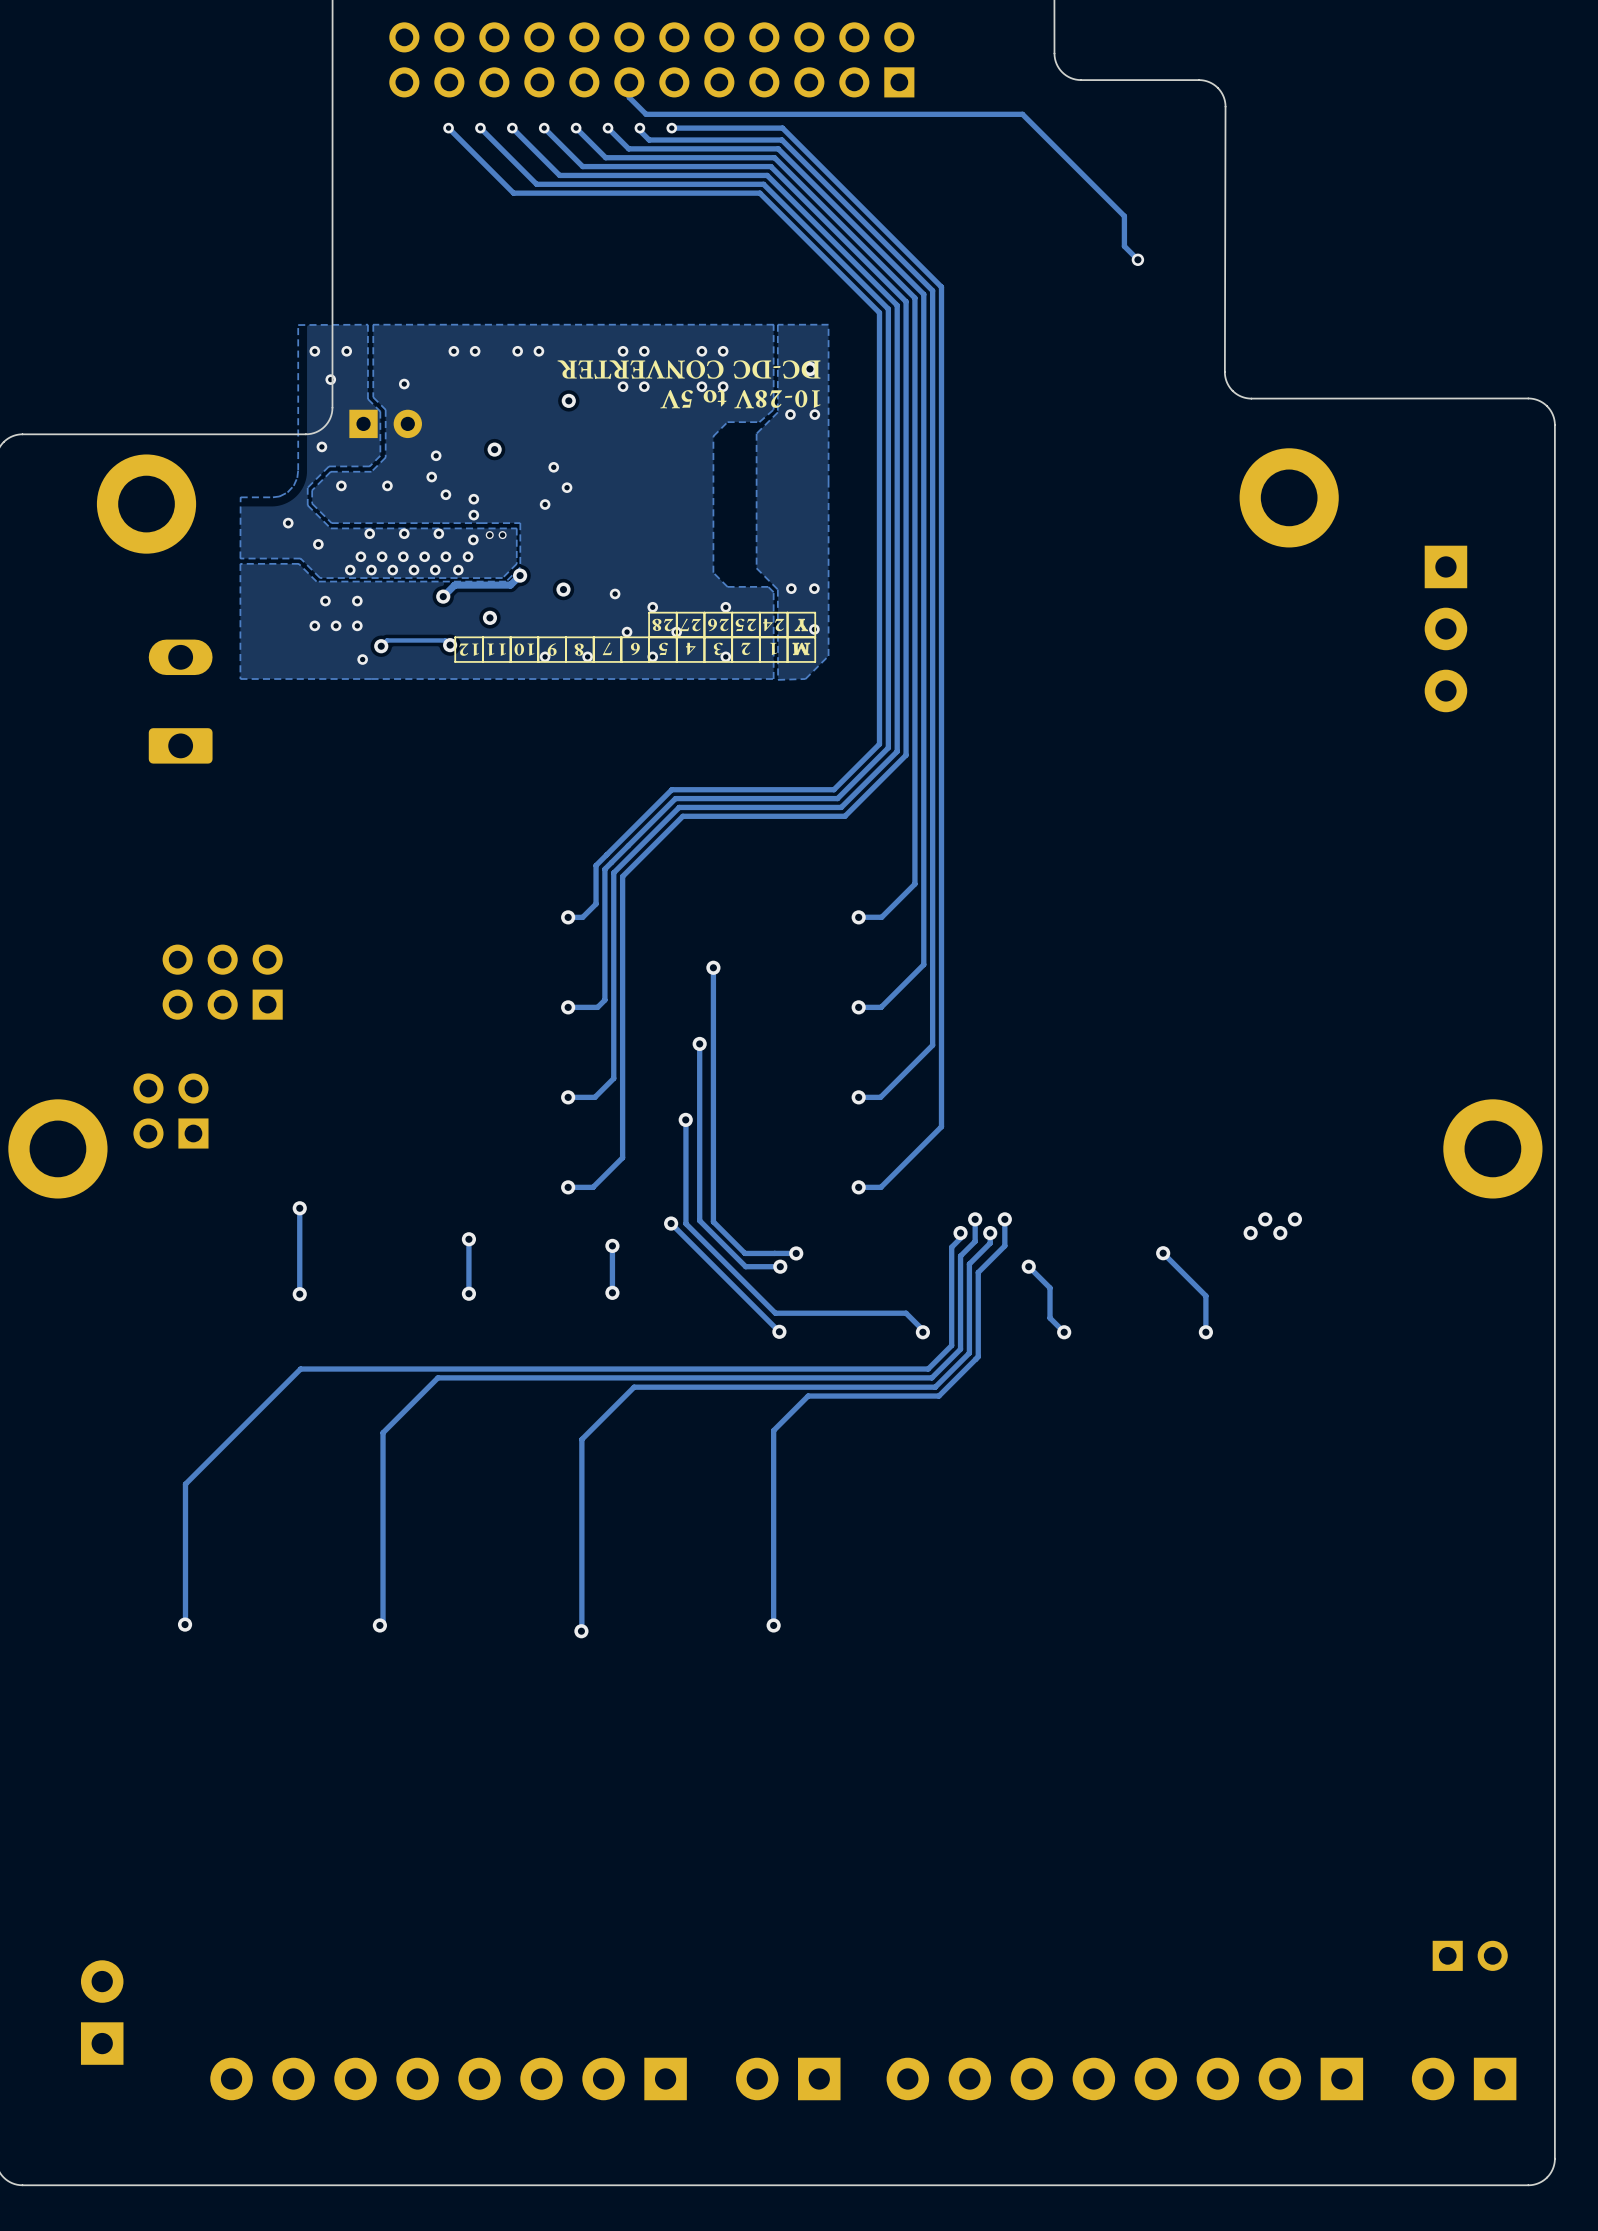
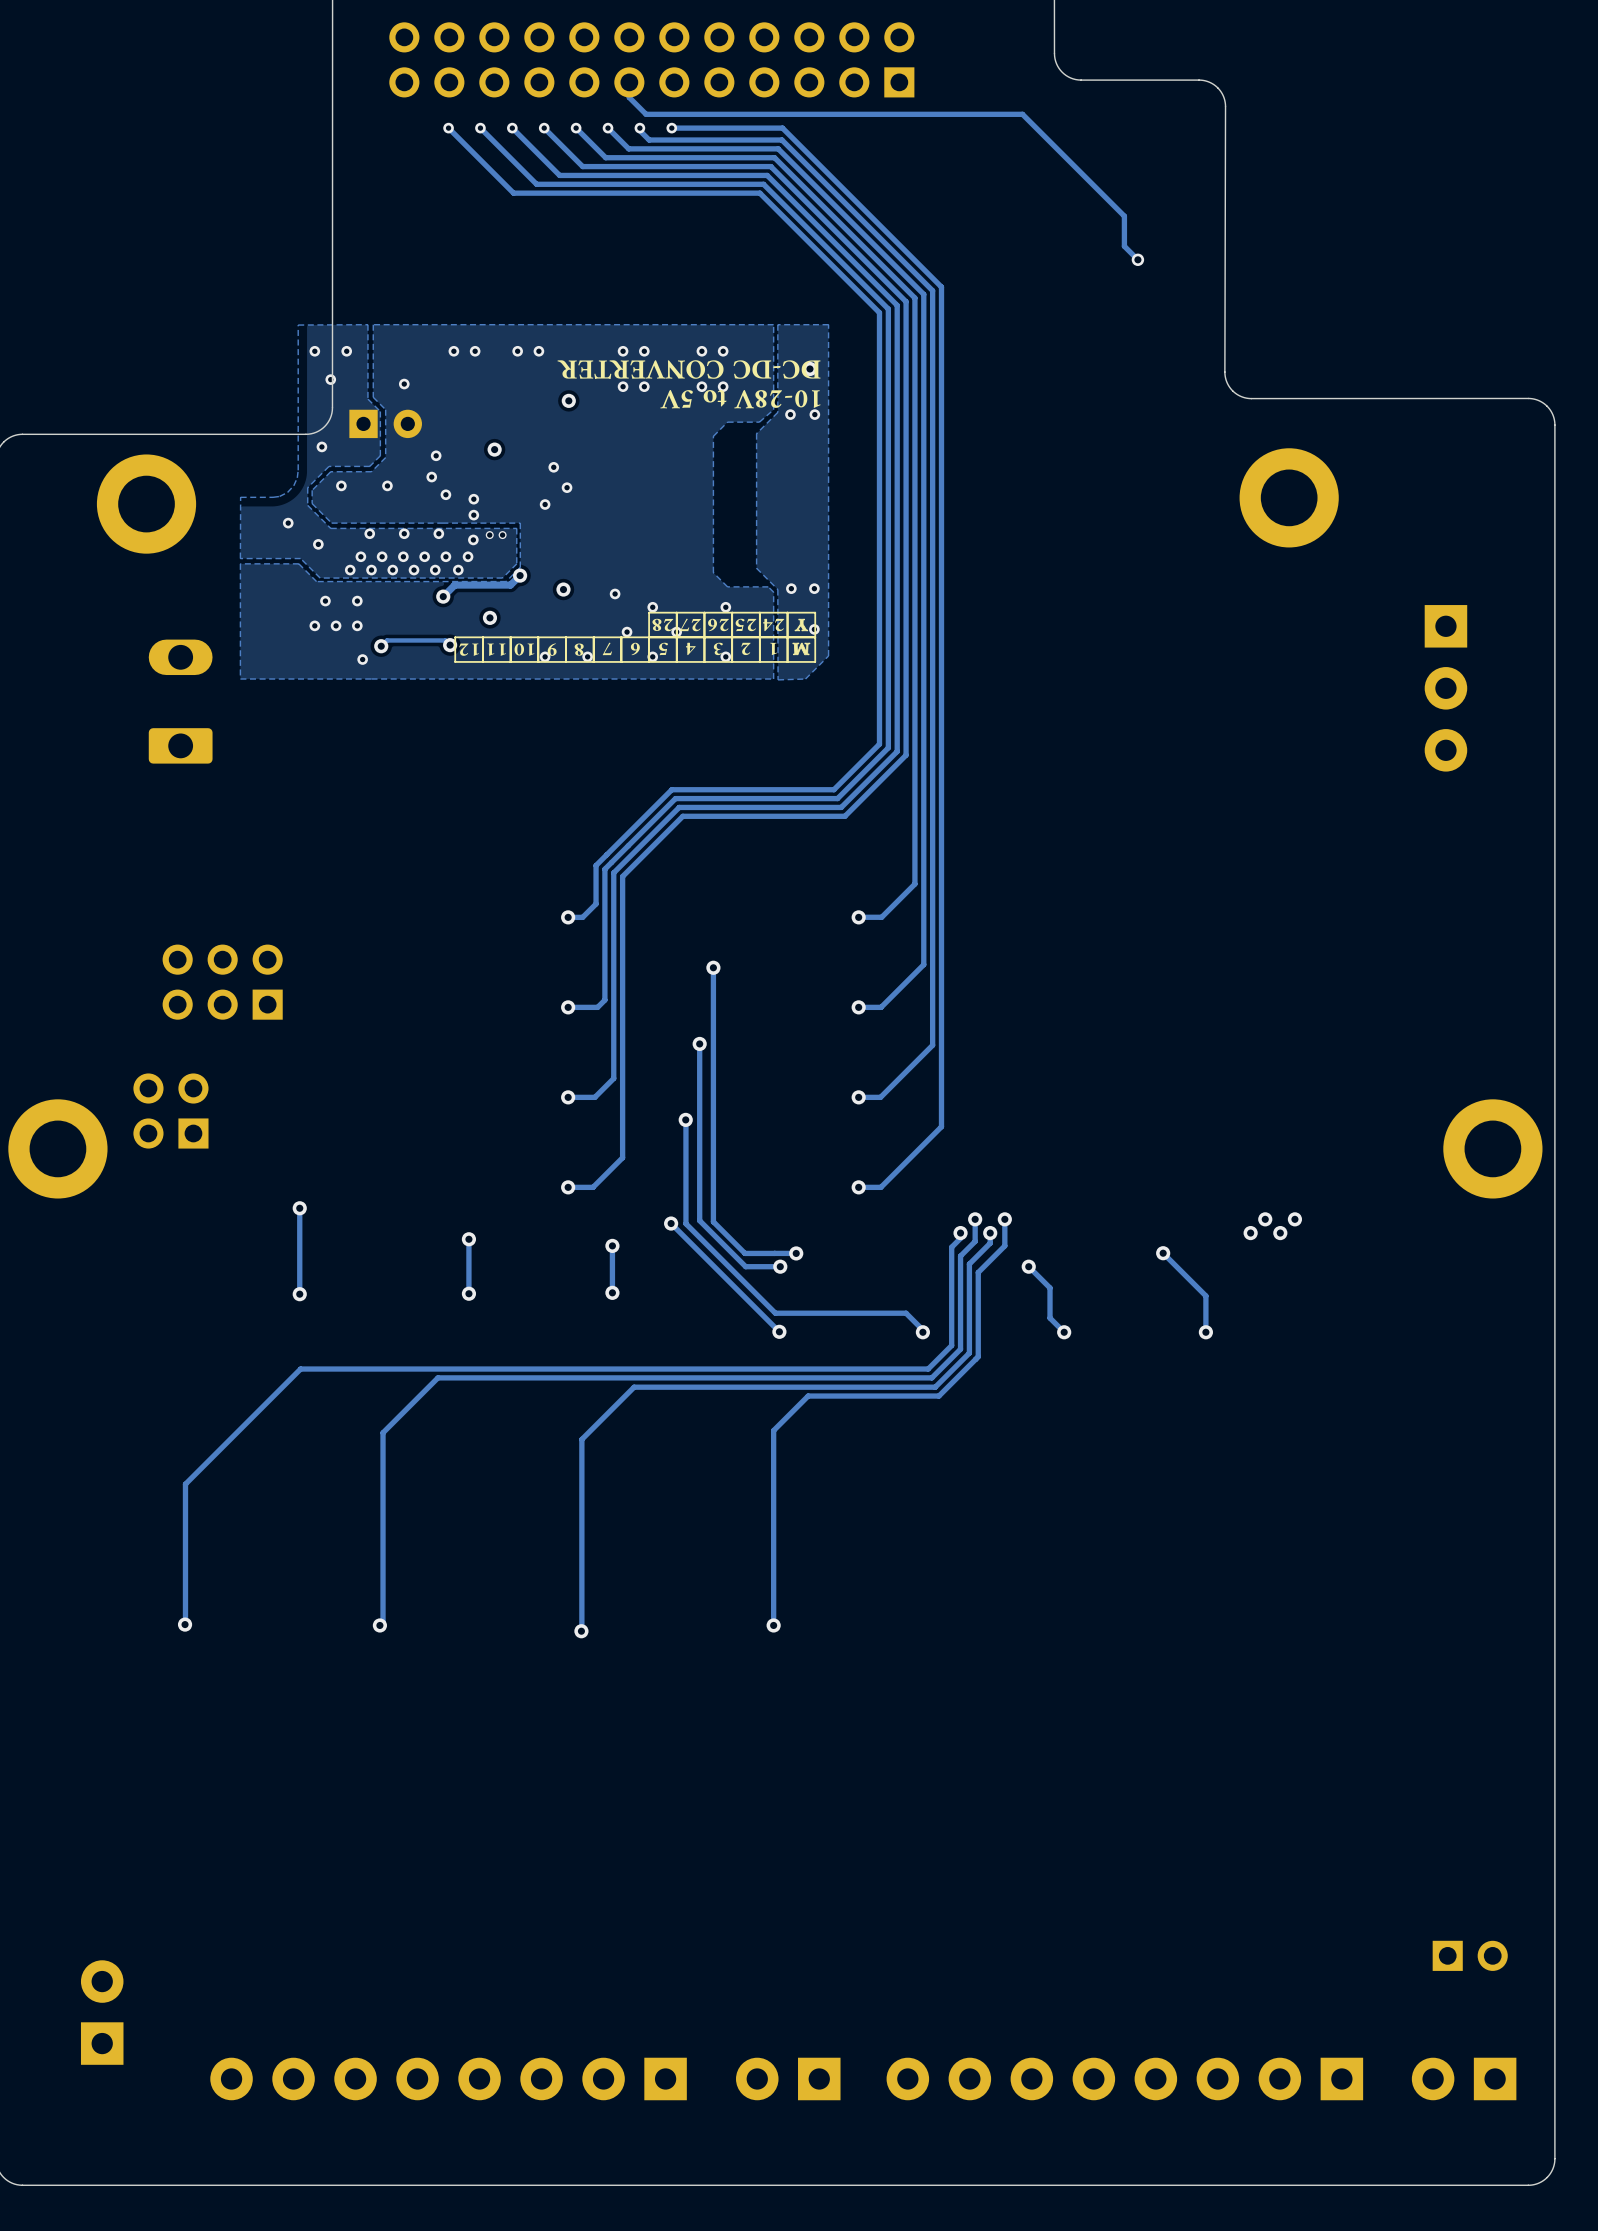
part position: (1445, 628) -> (1445, 688)

